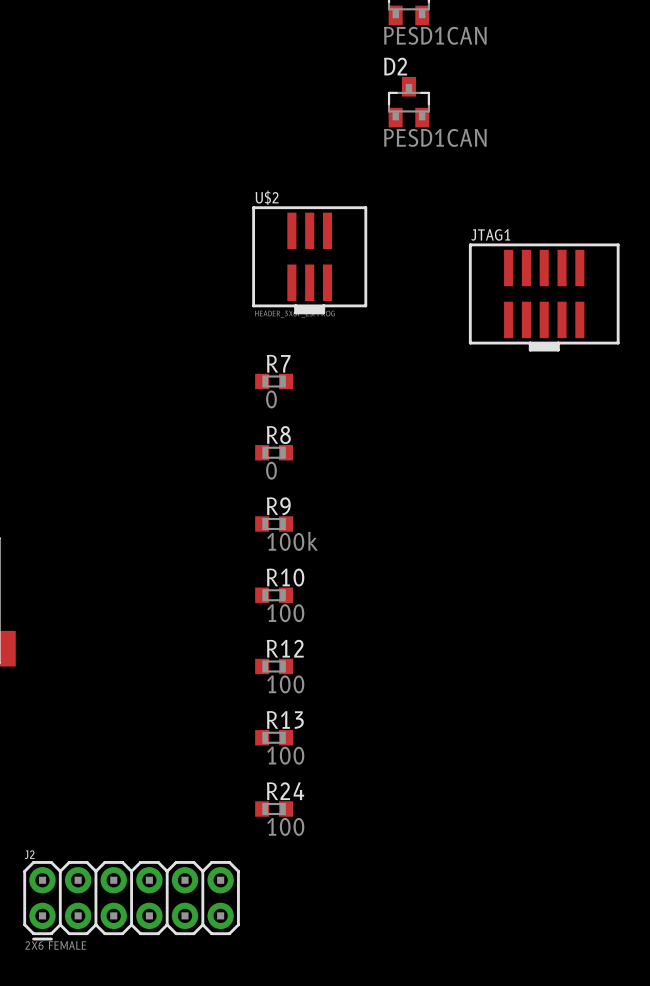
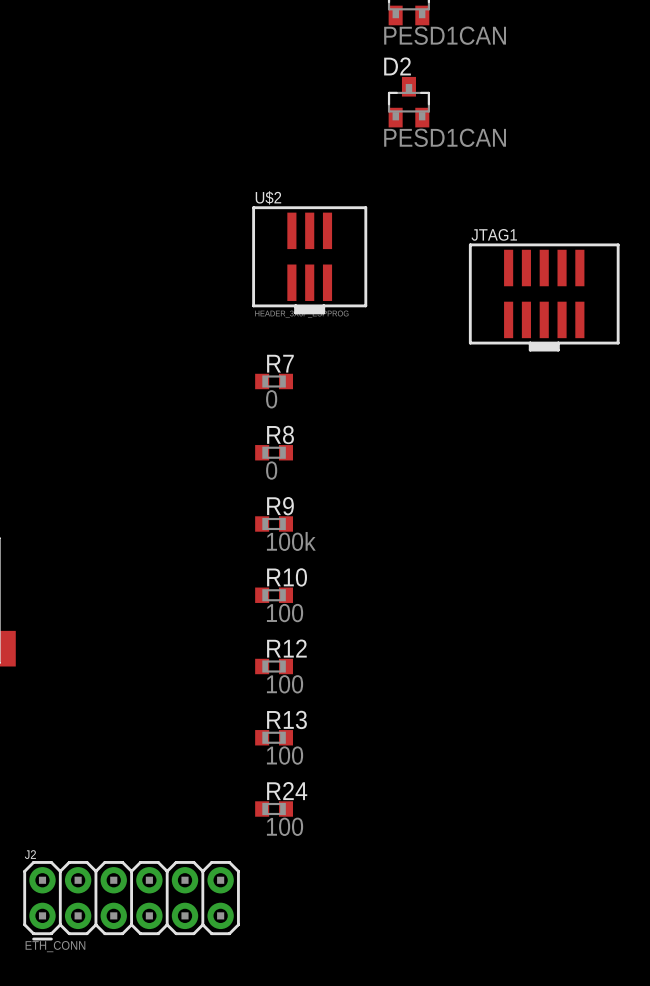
J2 value: 2X6 FEMALE (55, 945) -> ETH_CONN (55, 946)

